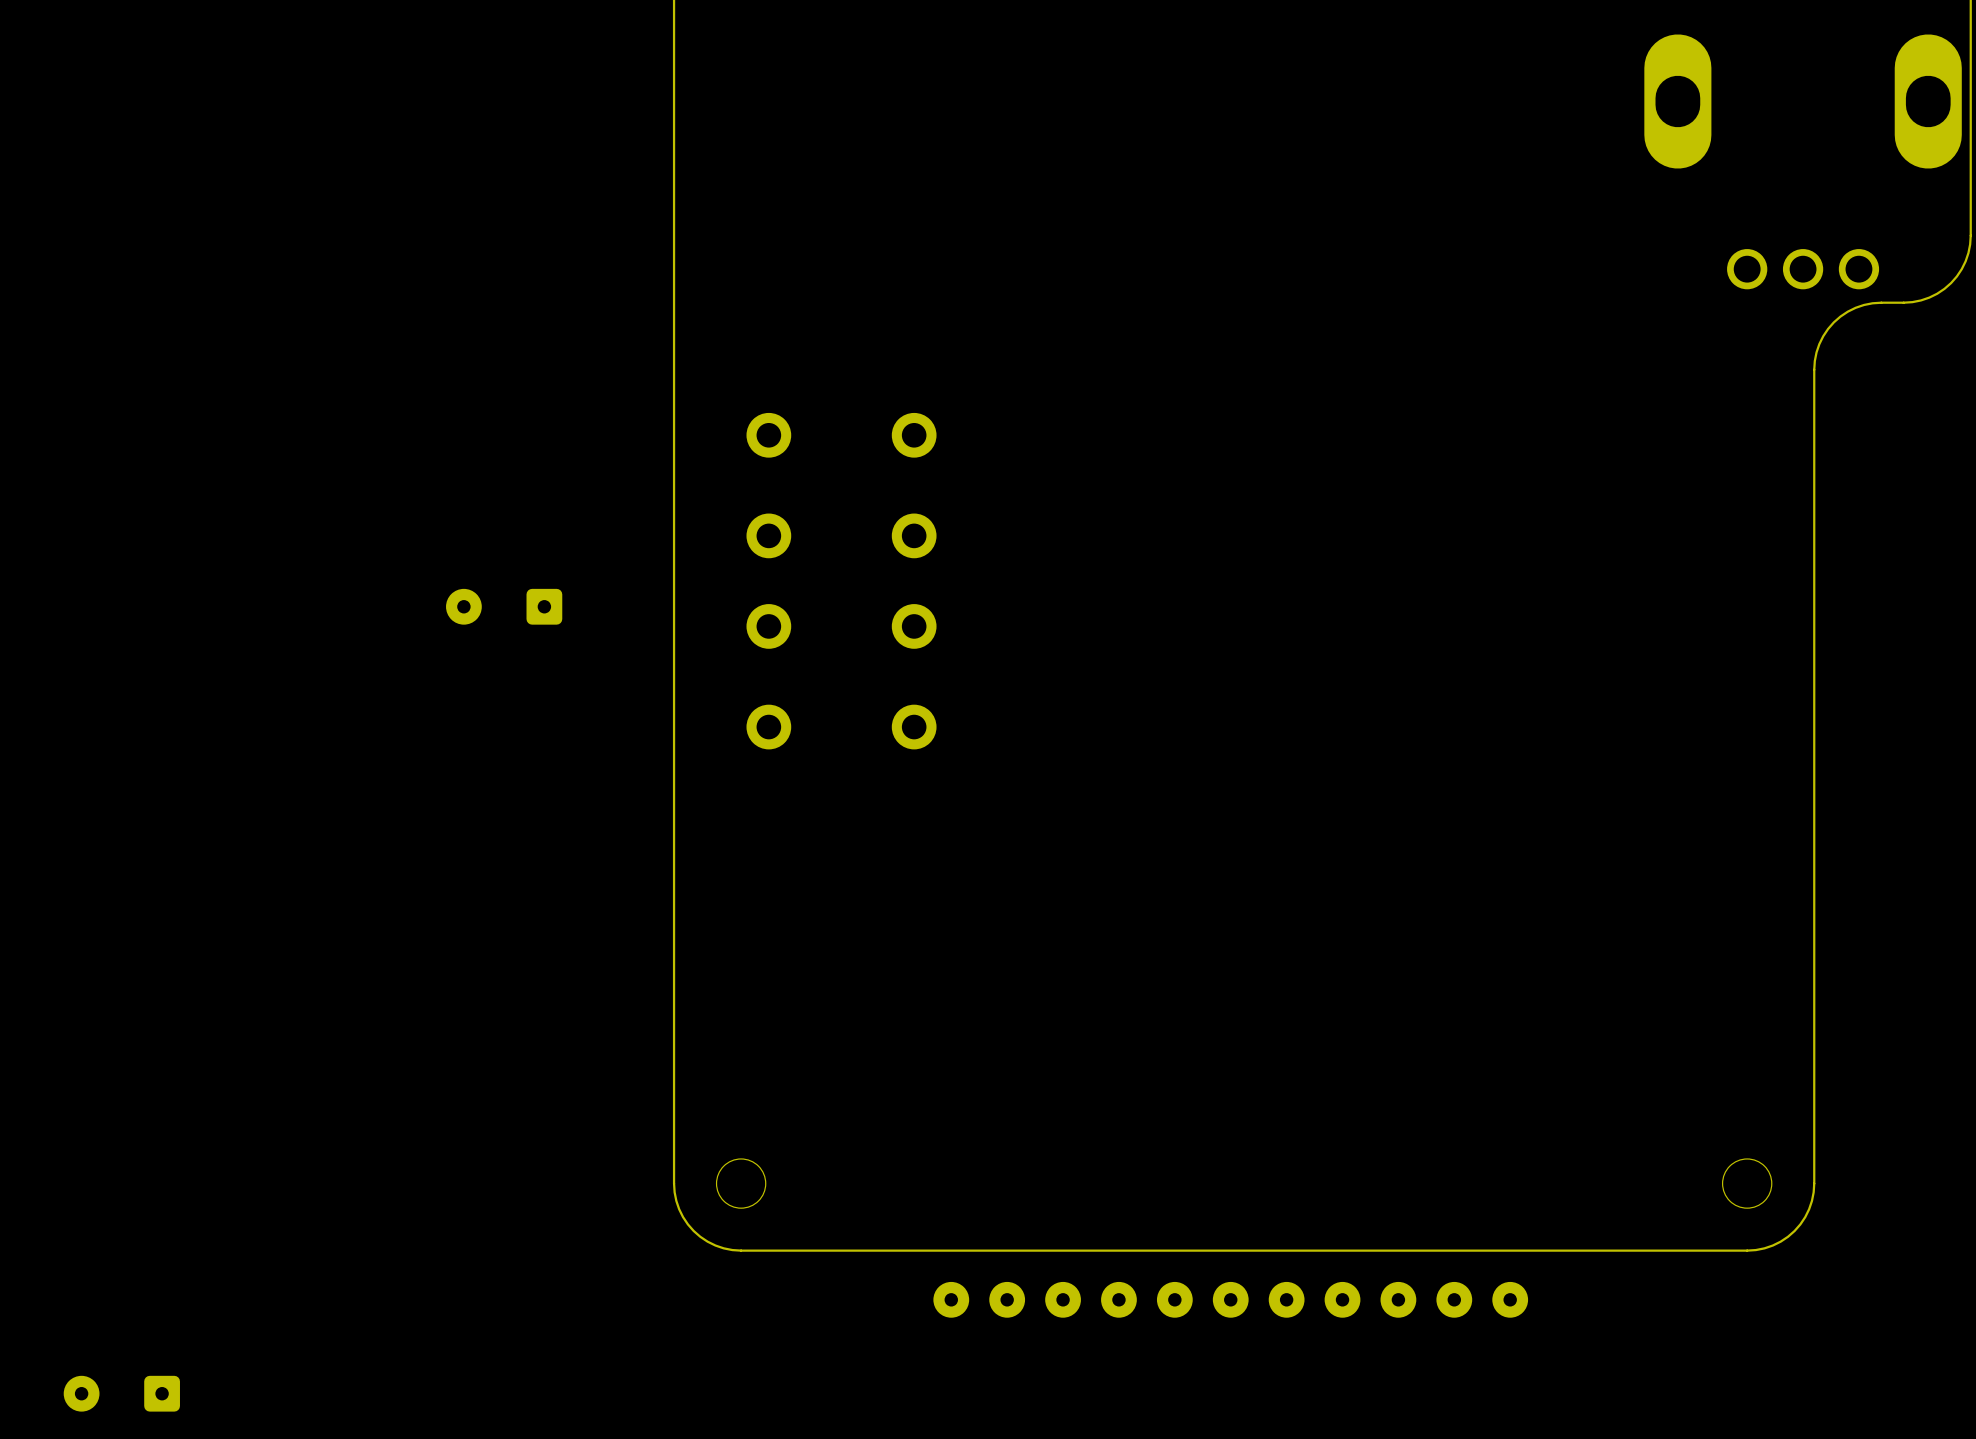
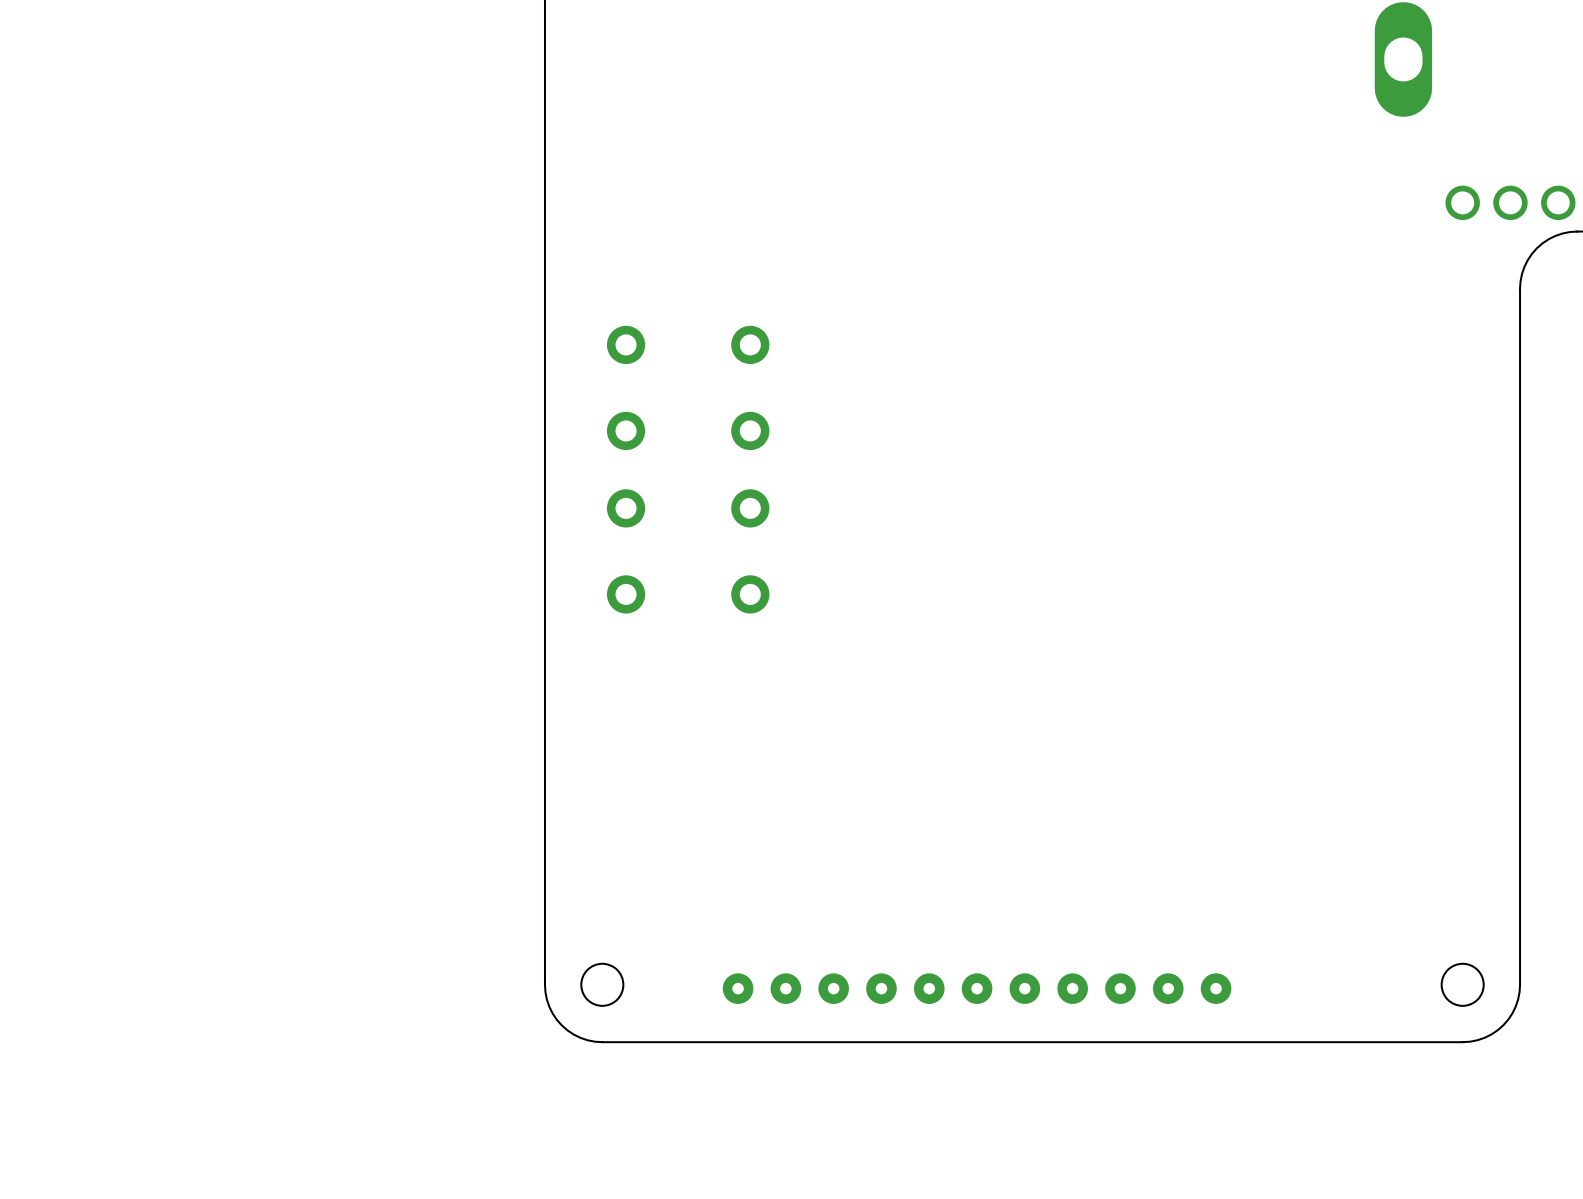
part: (504, 606) -> none
part position: (1230, 1299) -> (977, 988)
part: (121, 1393) -> none

